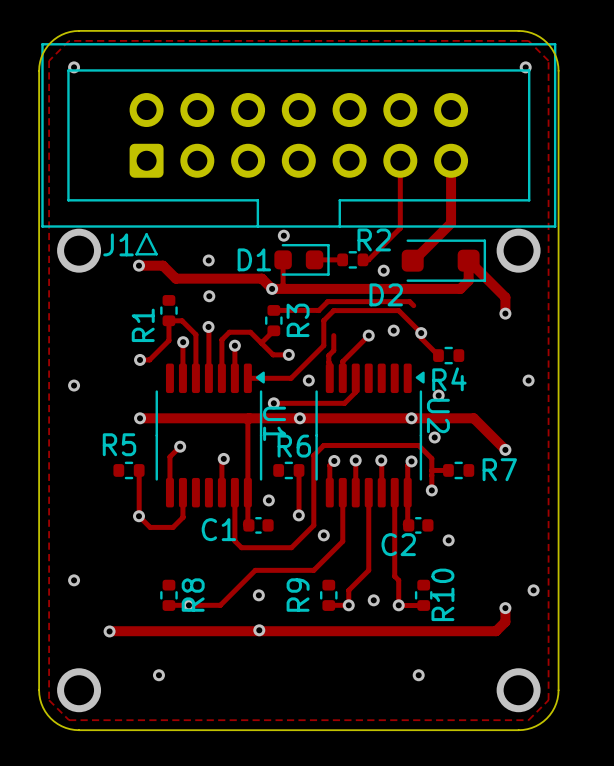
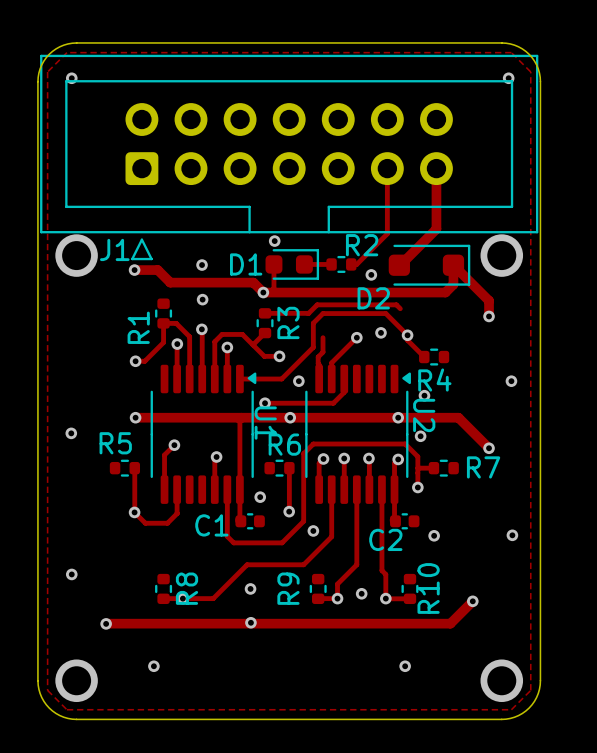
via position: (74, 385) -> (71, 433)
via: none -> (512, 535)
via: (533, 590) -> none
track: (505, 608) (505, 621) (496, 631) (465, 631) -> (472, 601) (450, 623)
via position: (505, 608) -> (472, 601)

